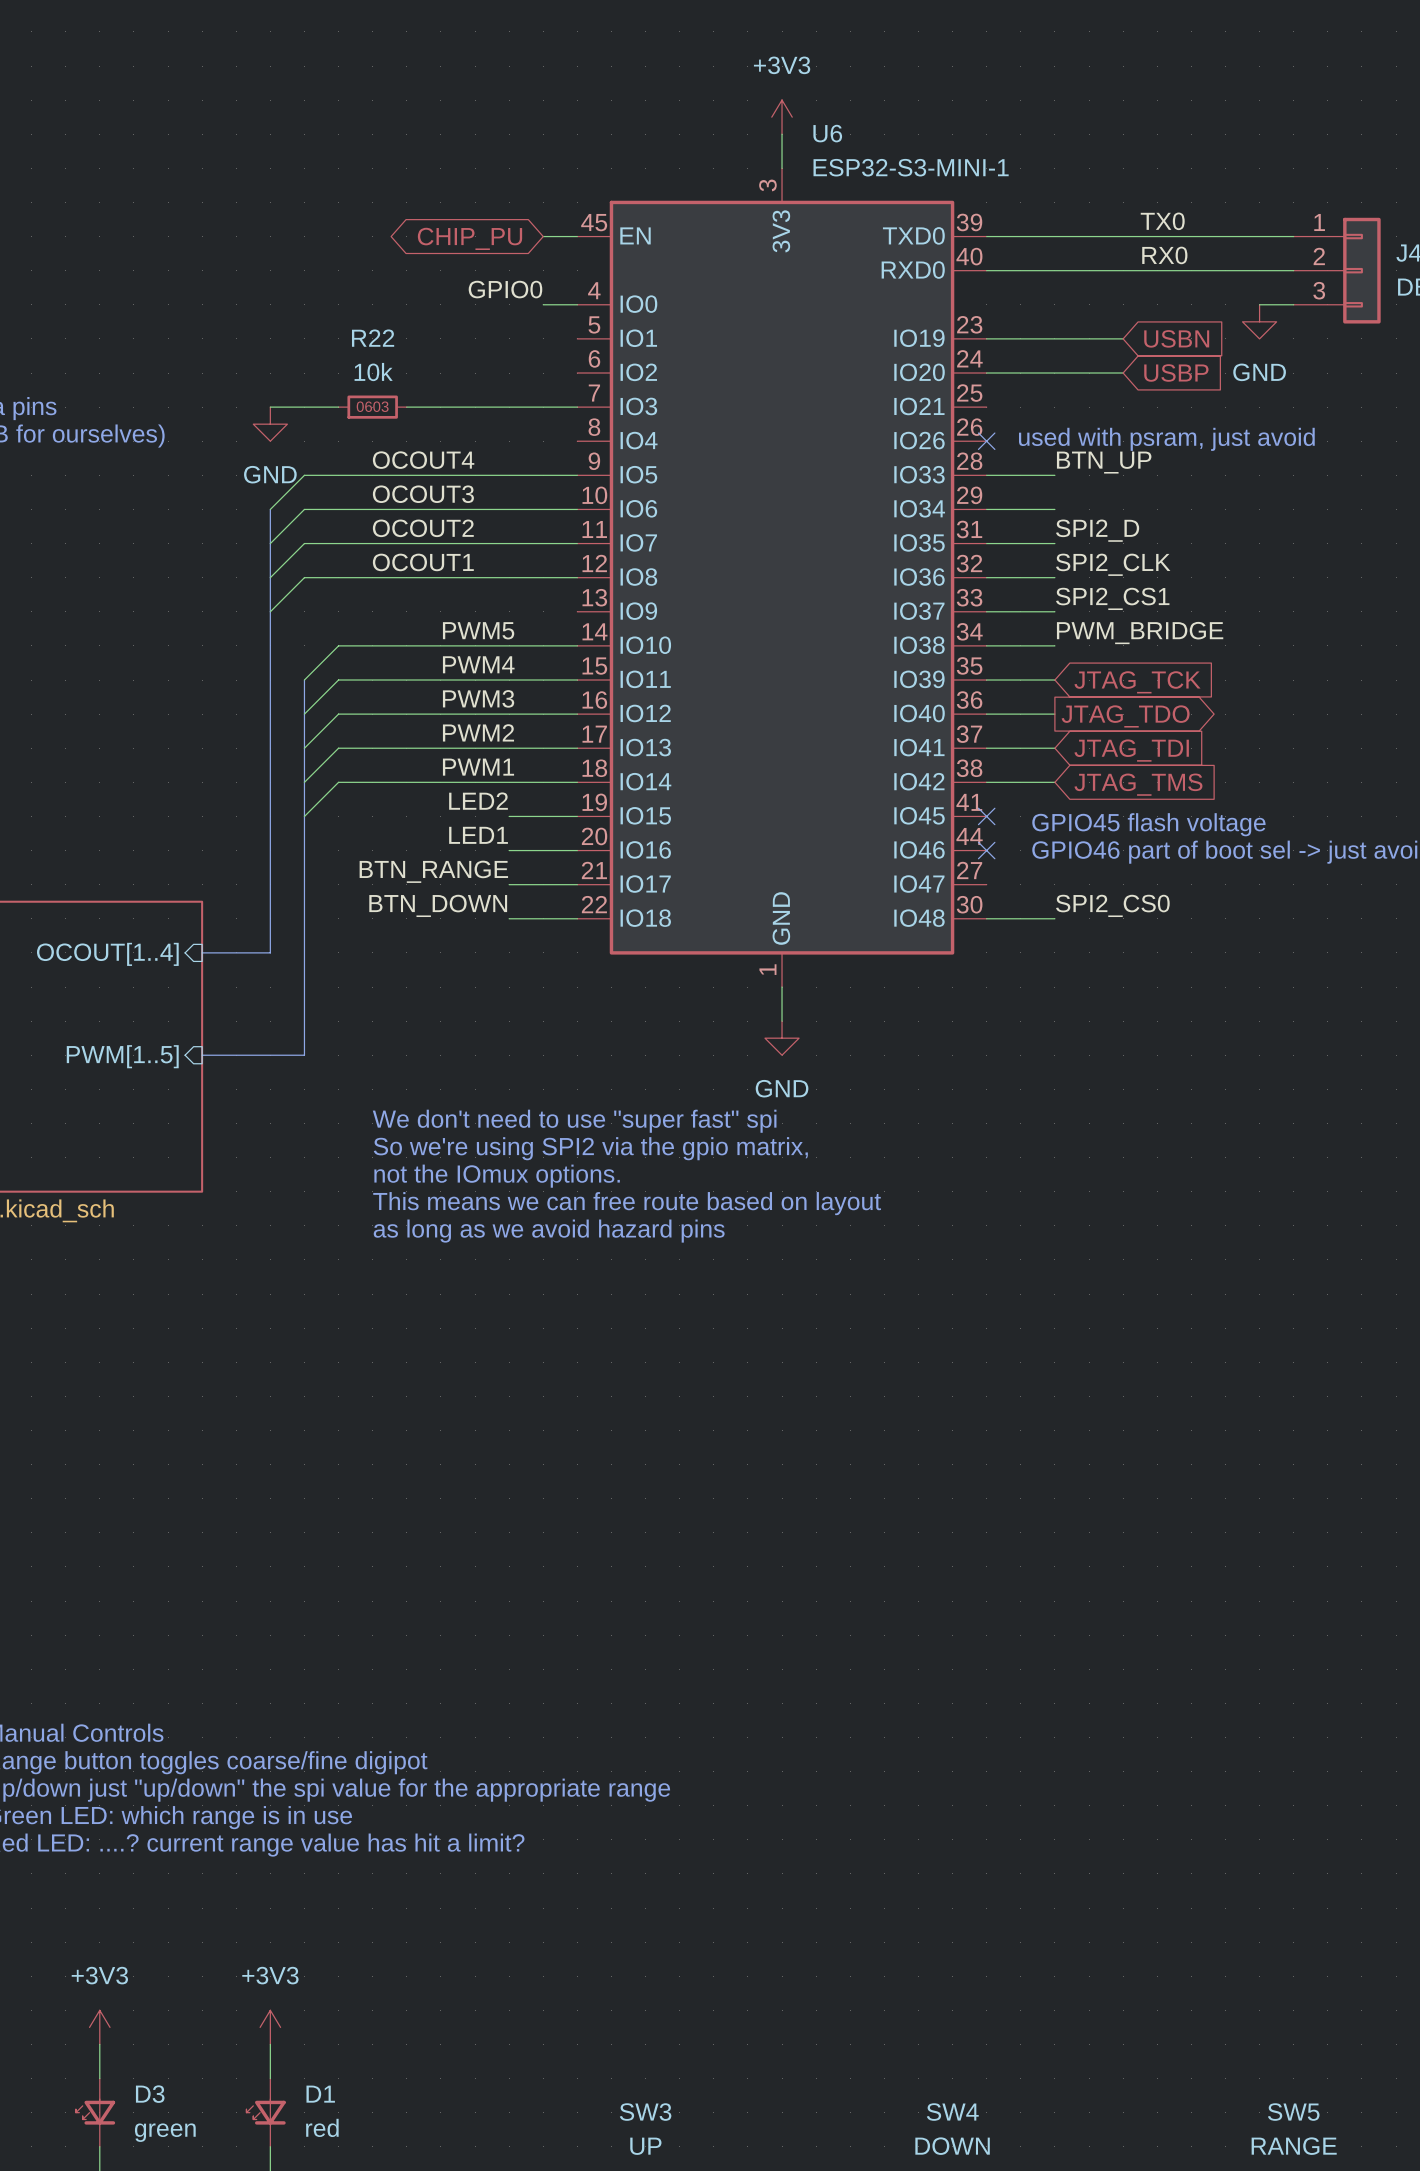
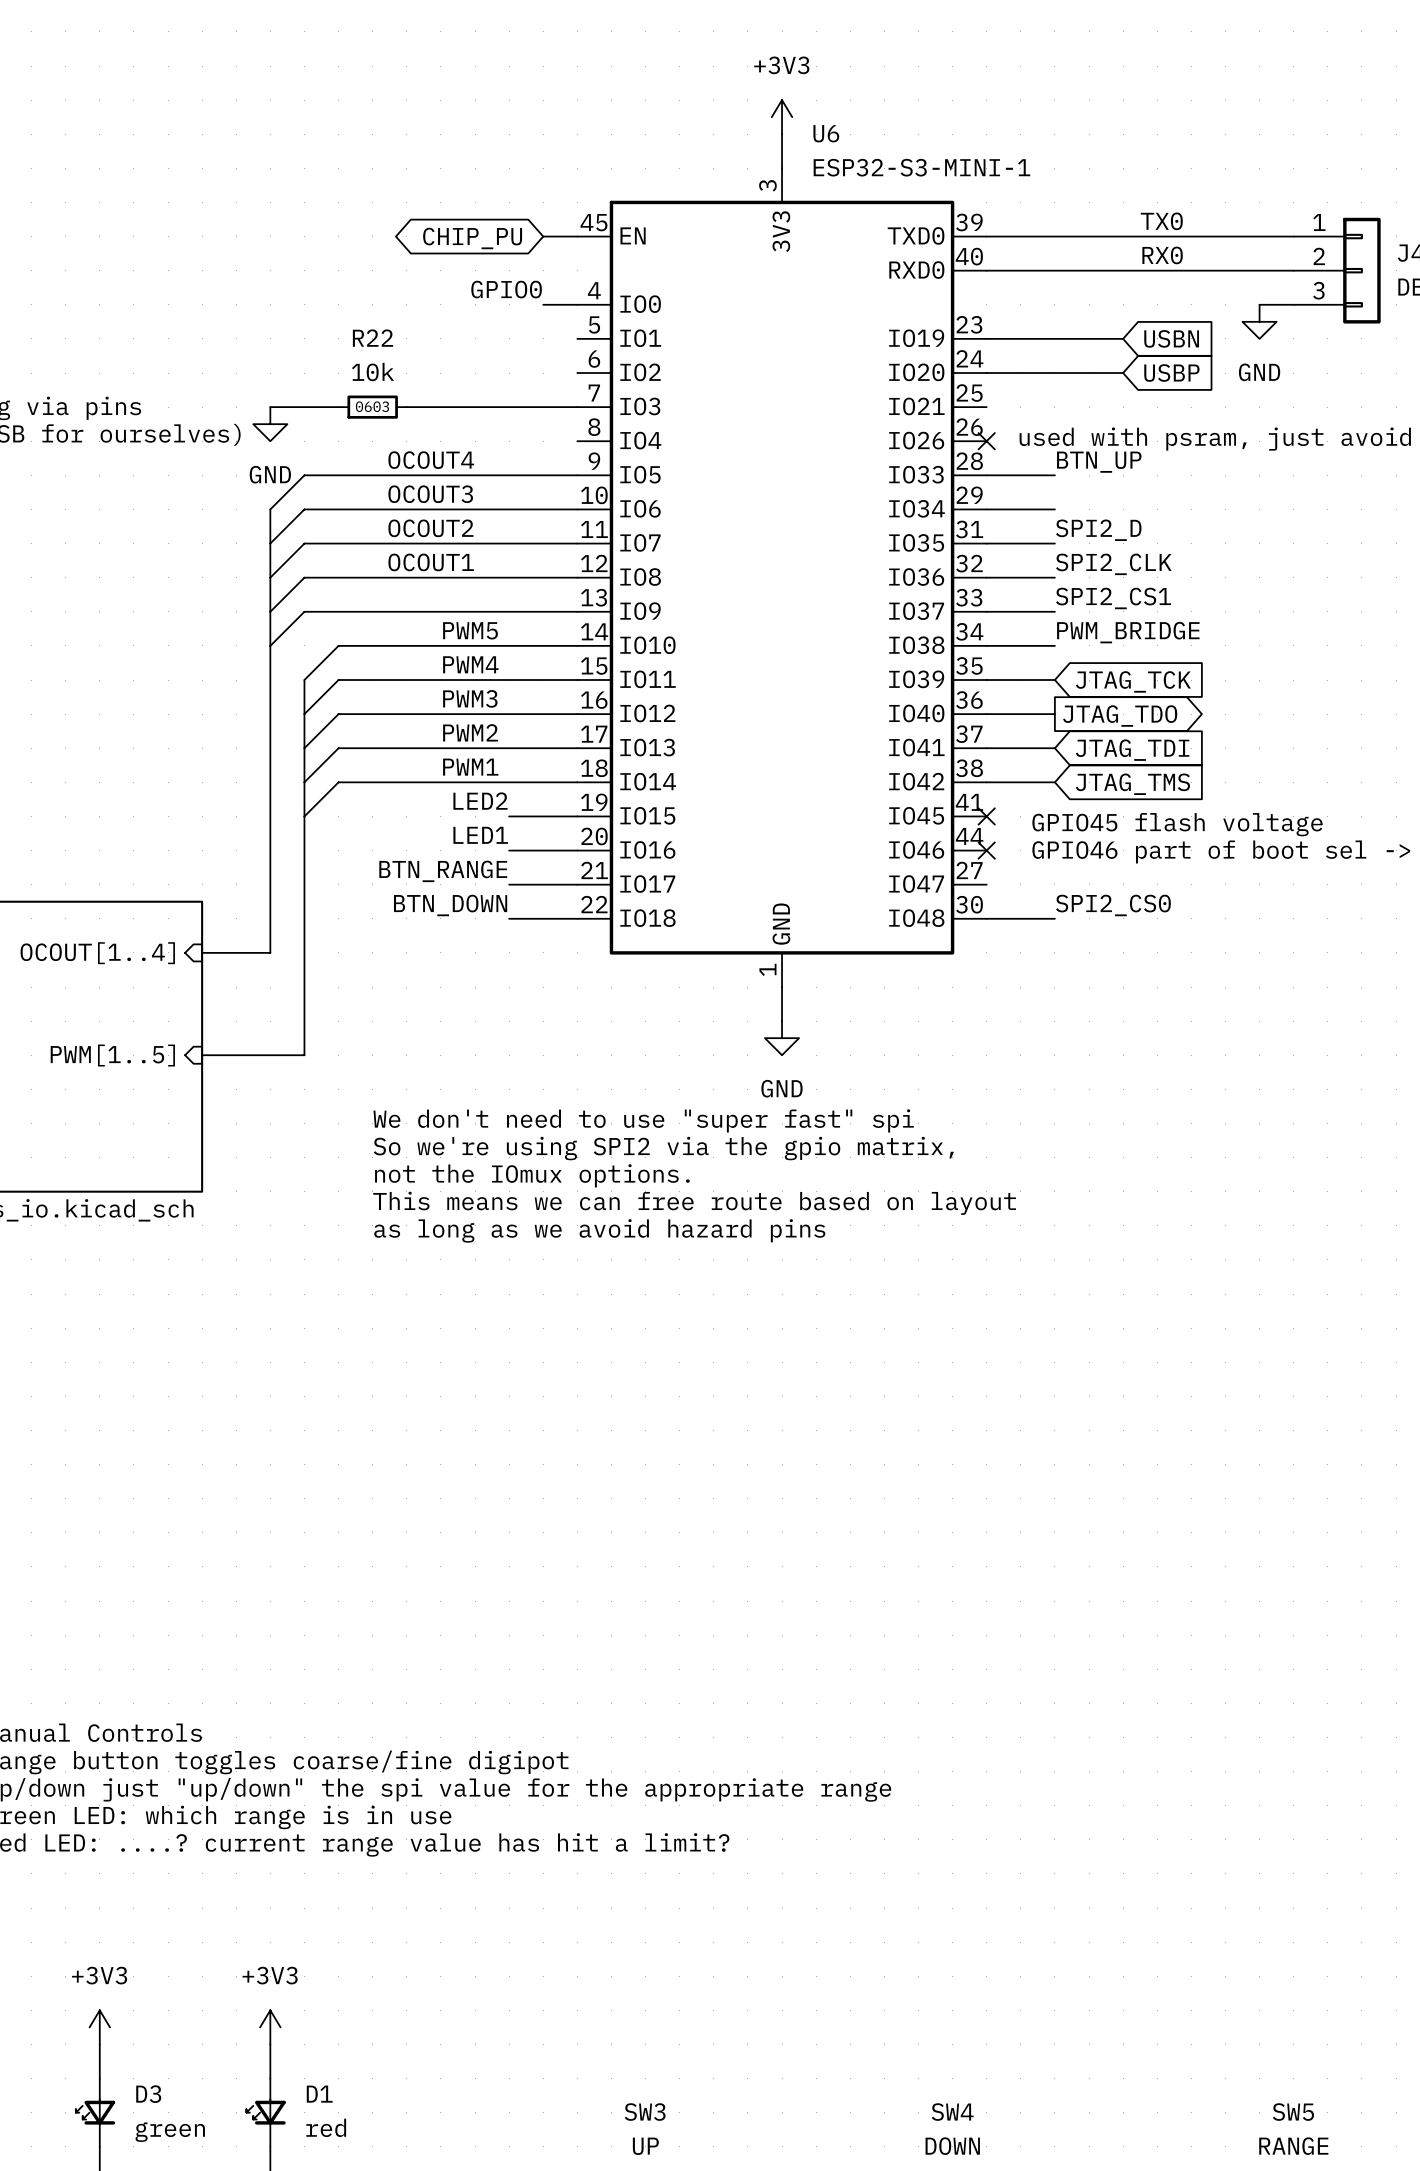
wire: none -> (577, 611) (304, 611) (270, 645)

